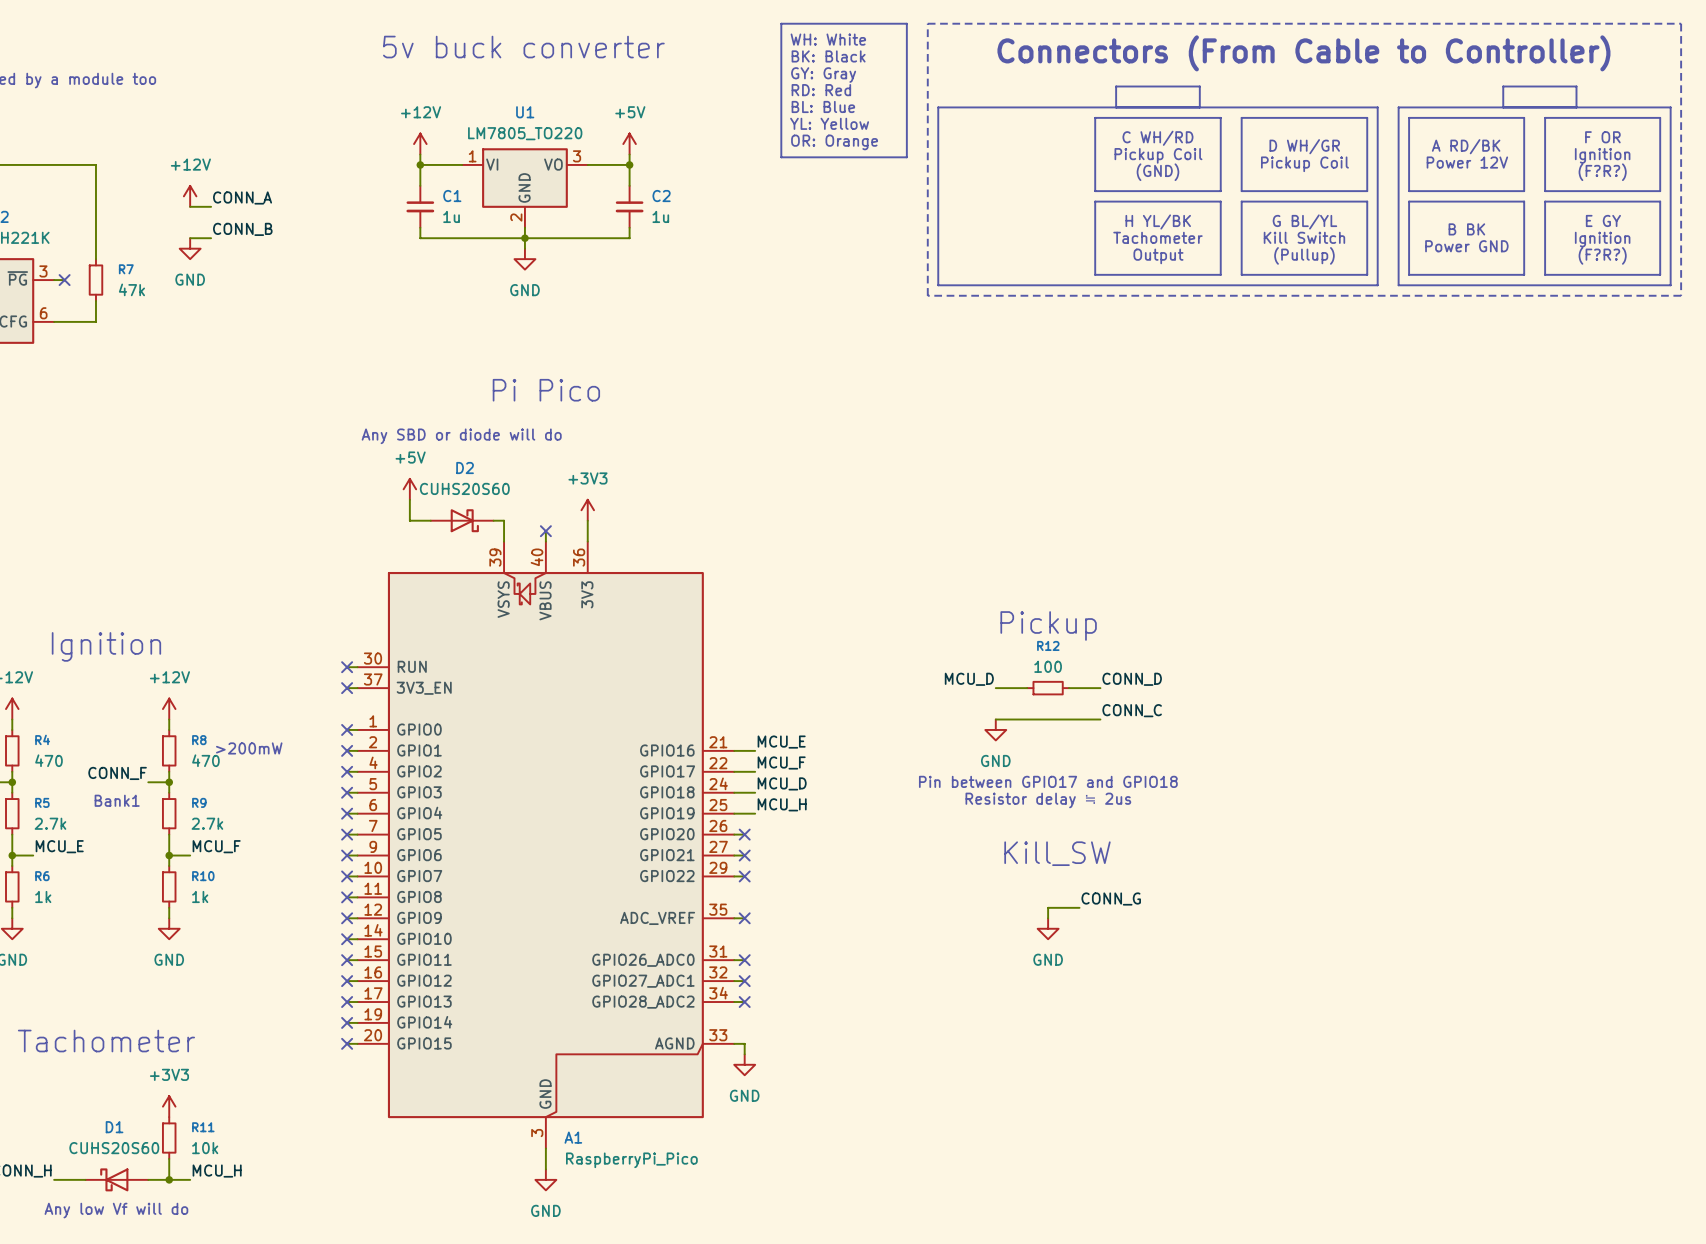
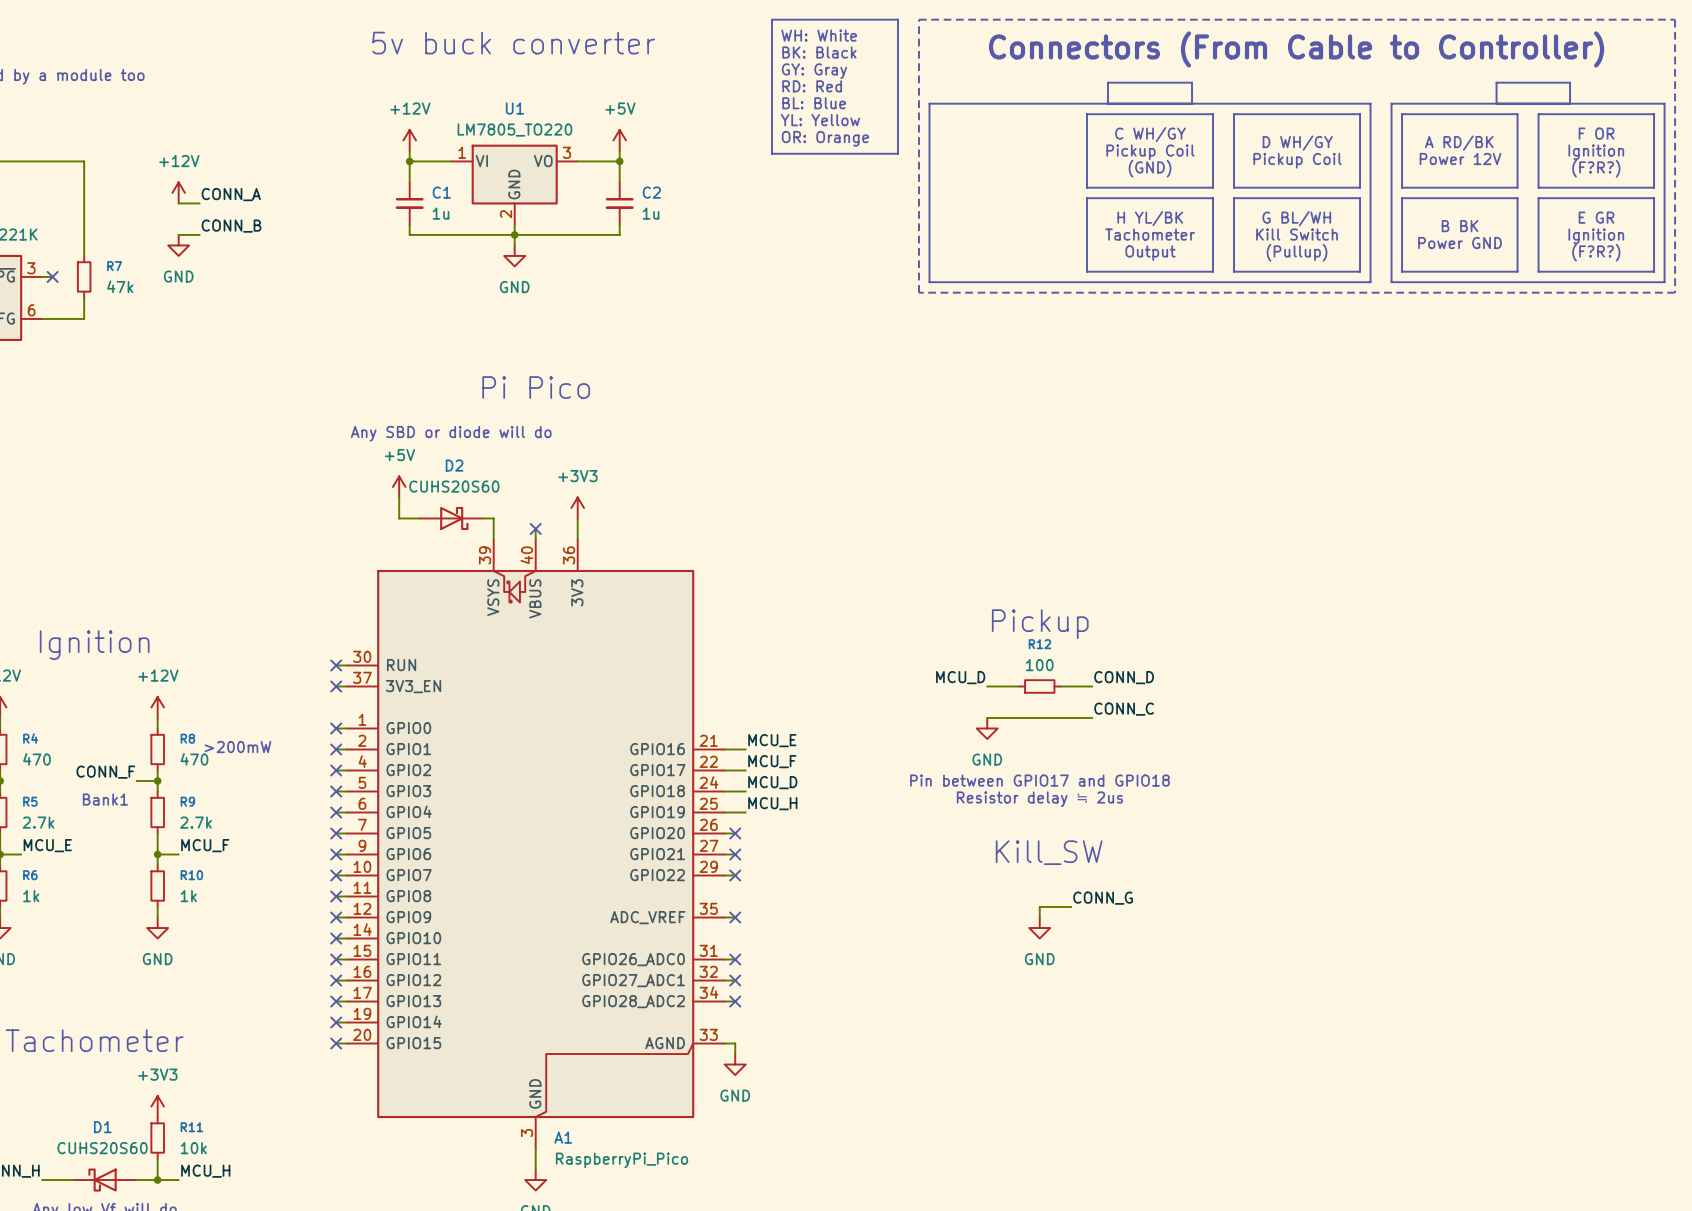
text: C WH/RD (1157, 138) -> C WH/GY (1150, 134)
text: D WH/GR (1304, 146) -> D WH/GY (1297, 143)
text: E GY (1603, 220) -> E GR (1596, 217)
text: G BL/YL (1304, 221) -> G BL/WH (1296, 218)

